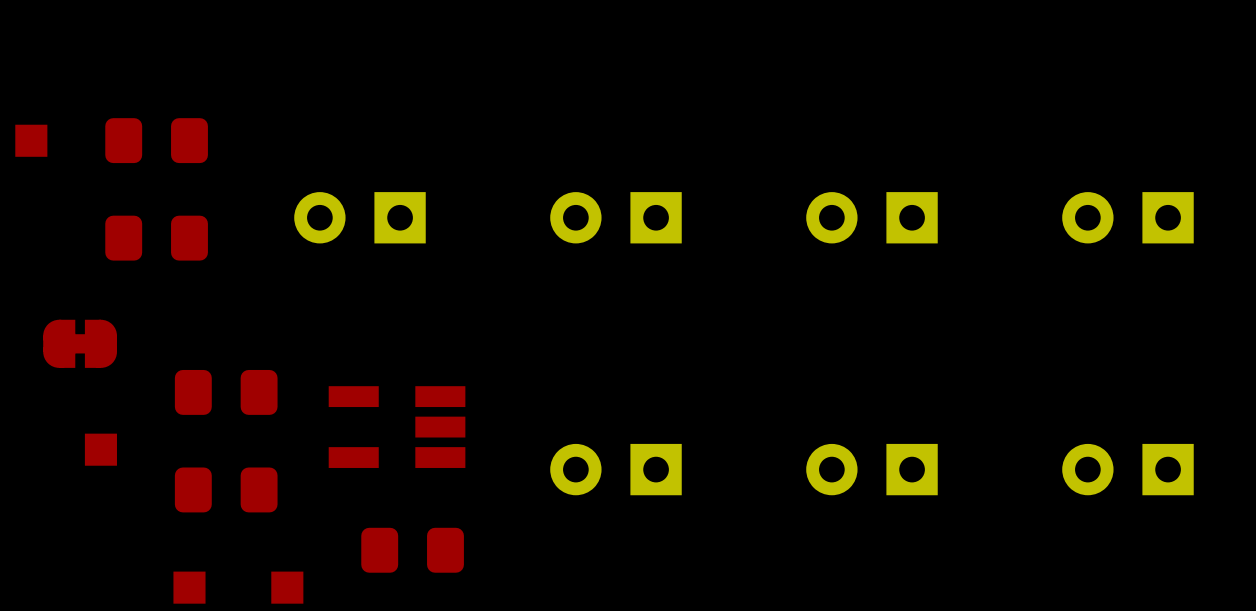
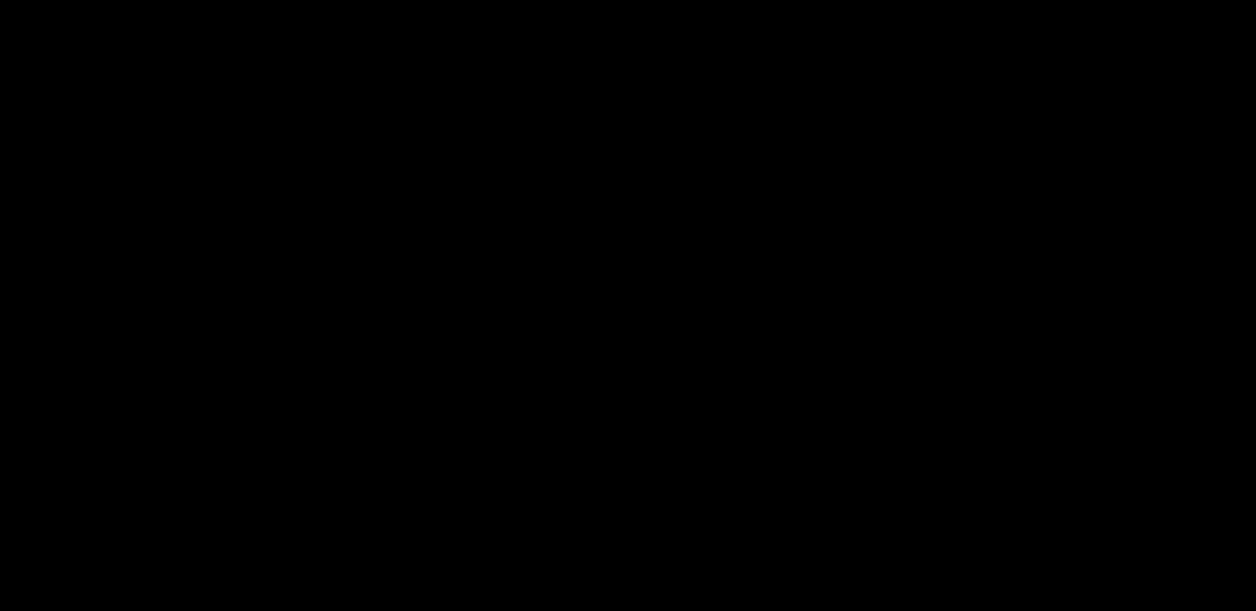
part: (31, 140) -> none
part: (156, 140) -> none
part: (359, 217) -> none
part: (615, 217) -> none
part: (871, 217) -> none
part: (1127, 217) -> none
part: (156, 238) -> none
part: (80, 343) -> none
part: (226, 392) -> none
part: (397, 427) -> none
part: (100, 449) -> none
part: (615, 469) -> none
part: (871, 469) -> none
part: (1127, 469) -> none
part: (226, 489) -> none
part: (412, 550) -> none
part: (189, 587) -> none
part: (287, 587) -> none

